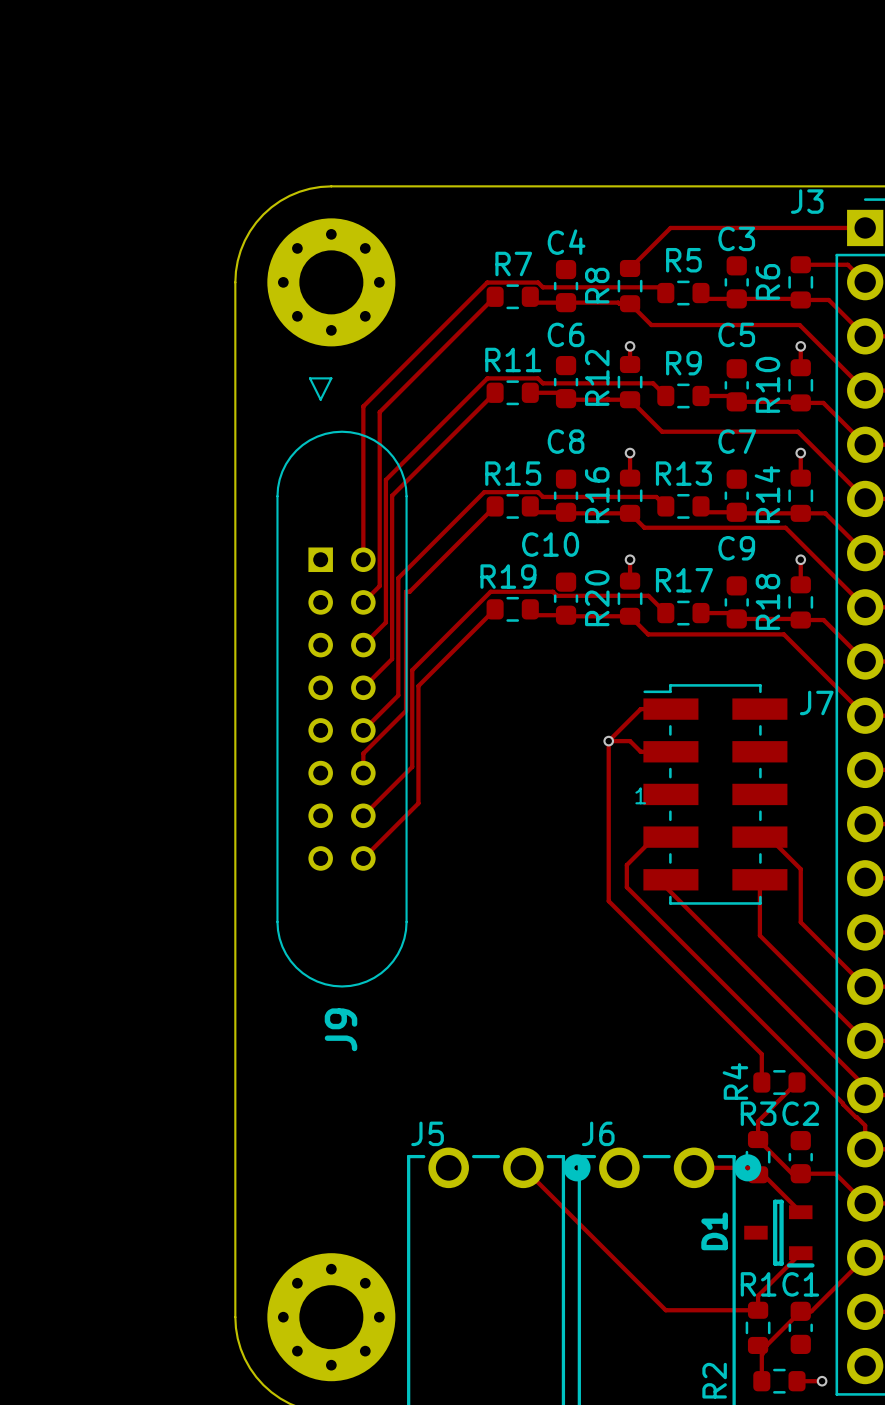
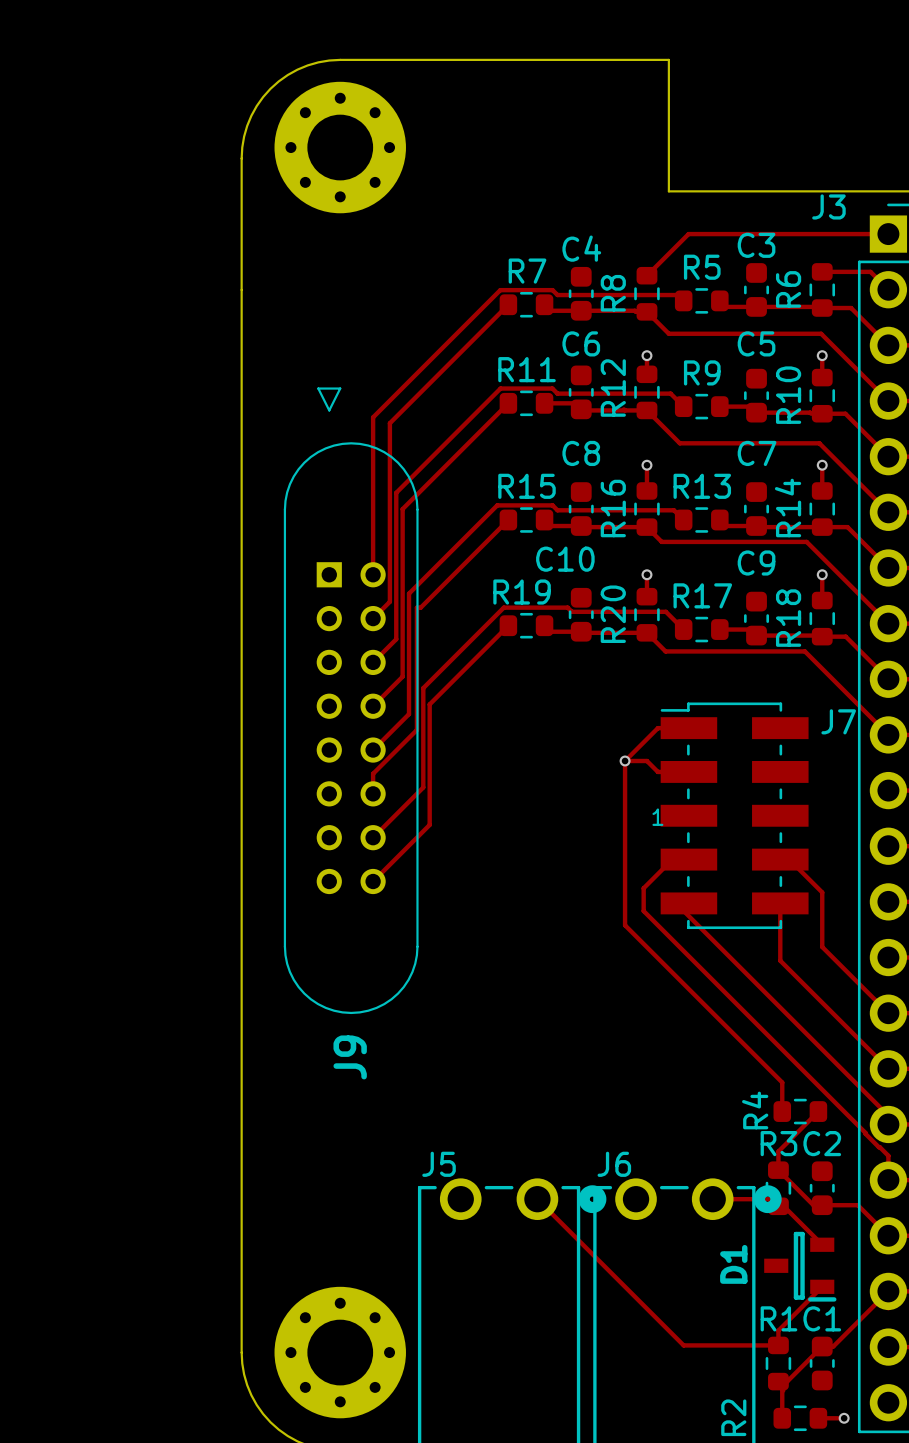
board edge: (651, 186) (331, 186) (309, 188) (280, 201) (256, 222) (240, 250) (235, 282) -> (668, 191) (668, 59) (340, 59) (318, 62) (297, 69) (278, 81) (256, 106) (247, 125) (241, 158) (241, 289)
part position: (331, 282) -> (340, 147)

